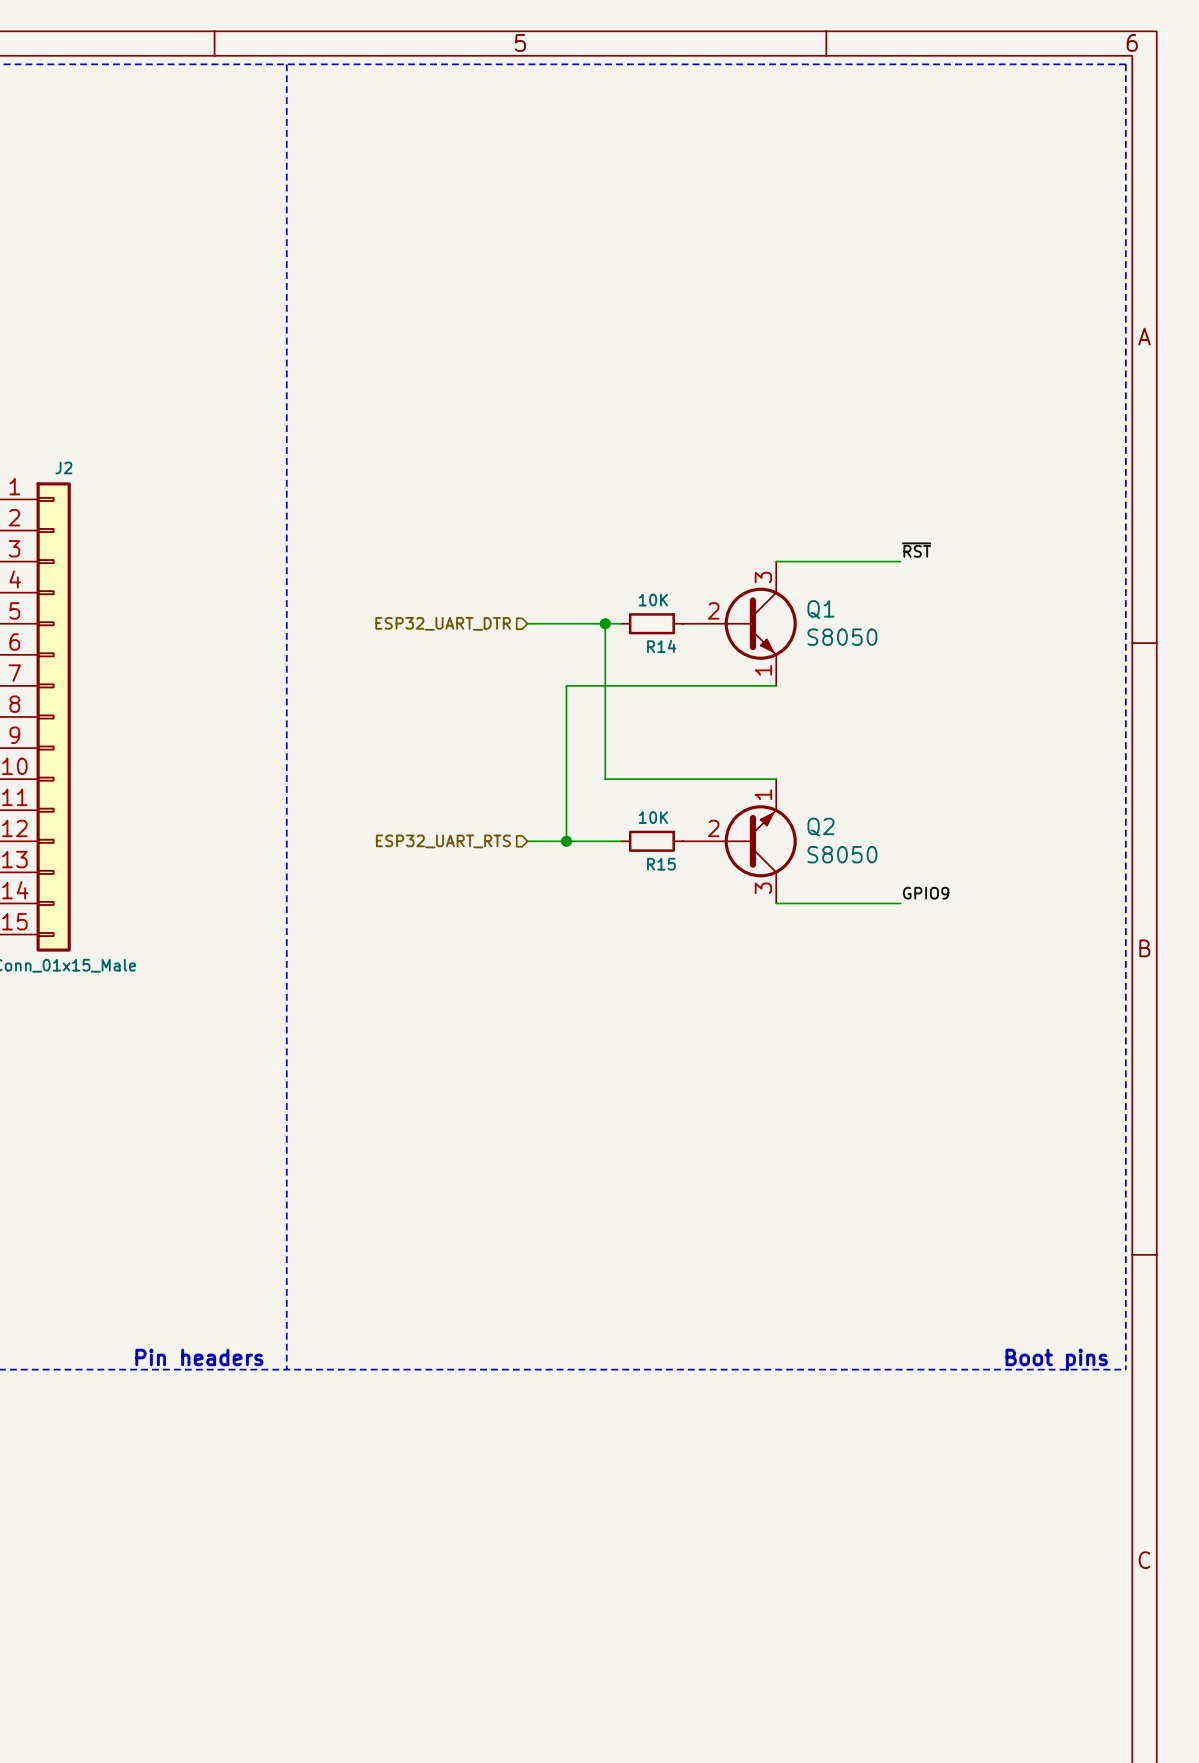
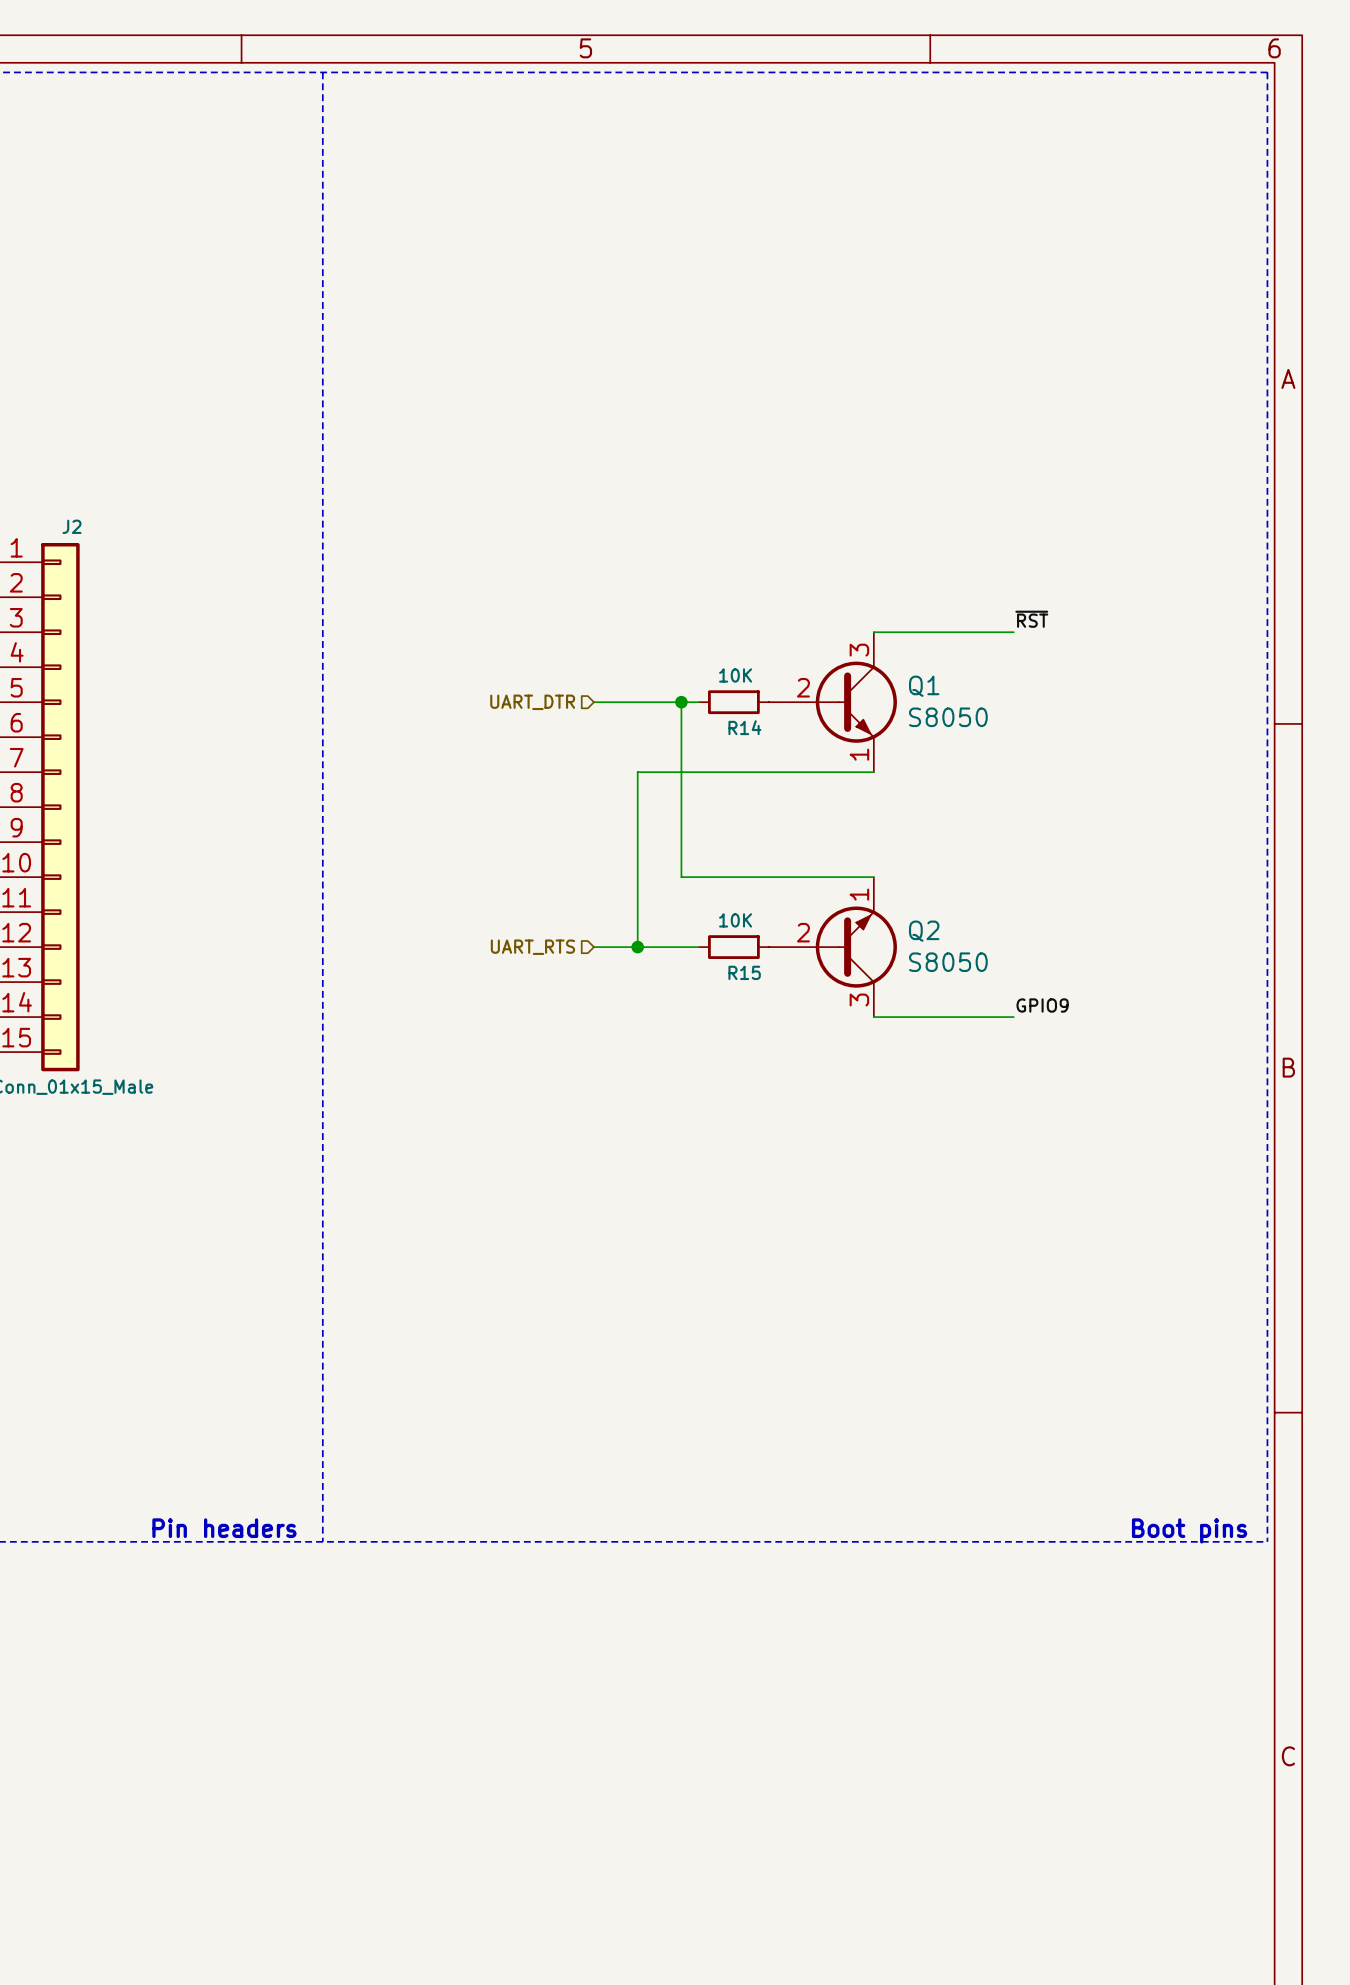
hierarchical label: ESP32_UART_DTR (443, 623) -> UART_DTR (532, 702)
hierarchical label: ESP32_UART_RTS (443, 841) -> UART_RTS (532, 947)

